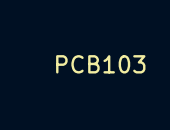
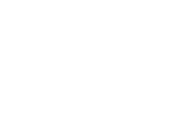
PCB103: (100, 64) -> none

